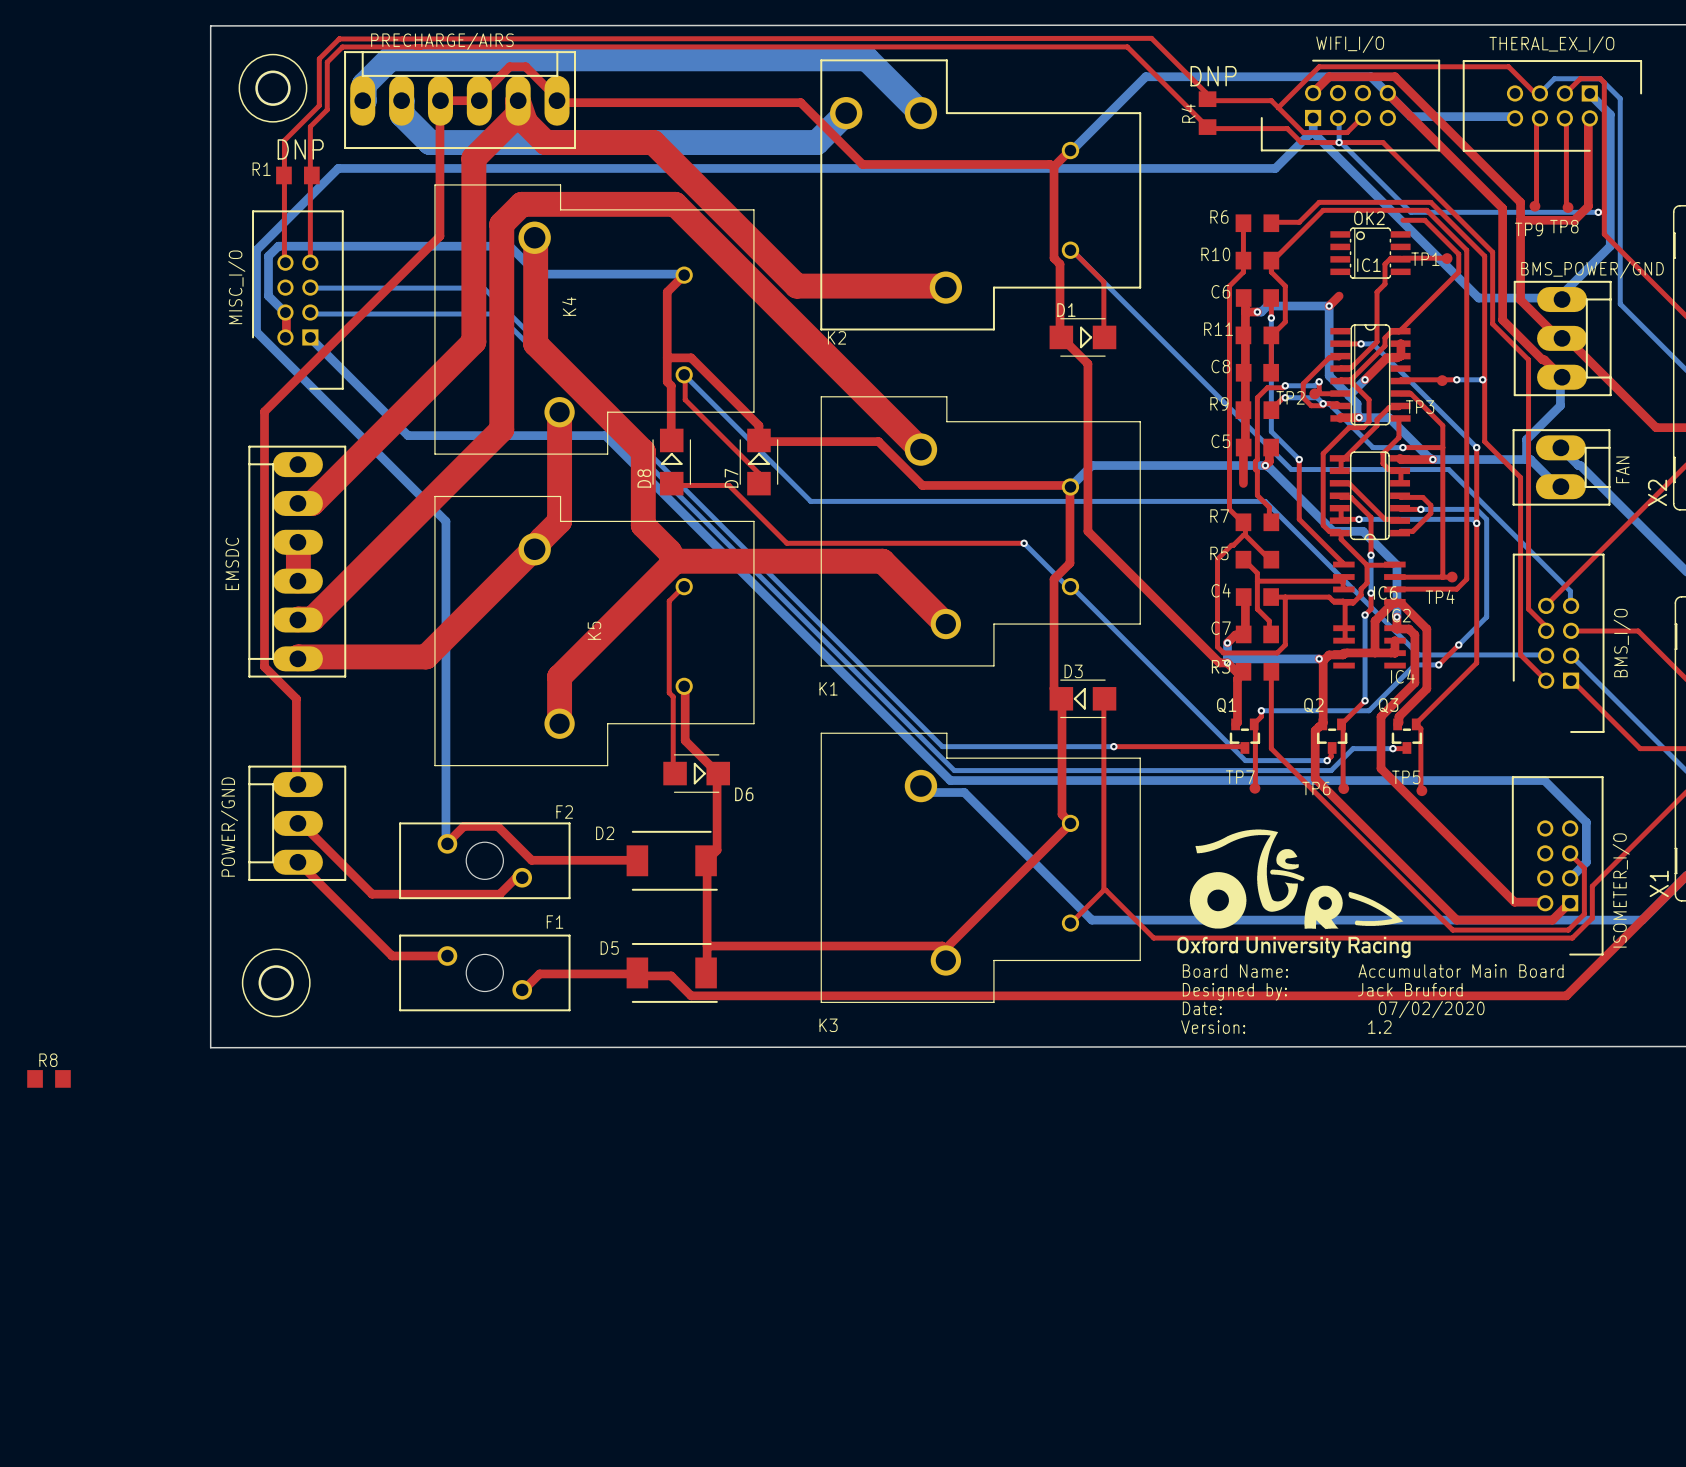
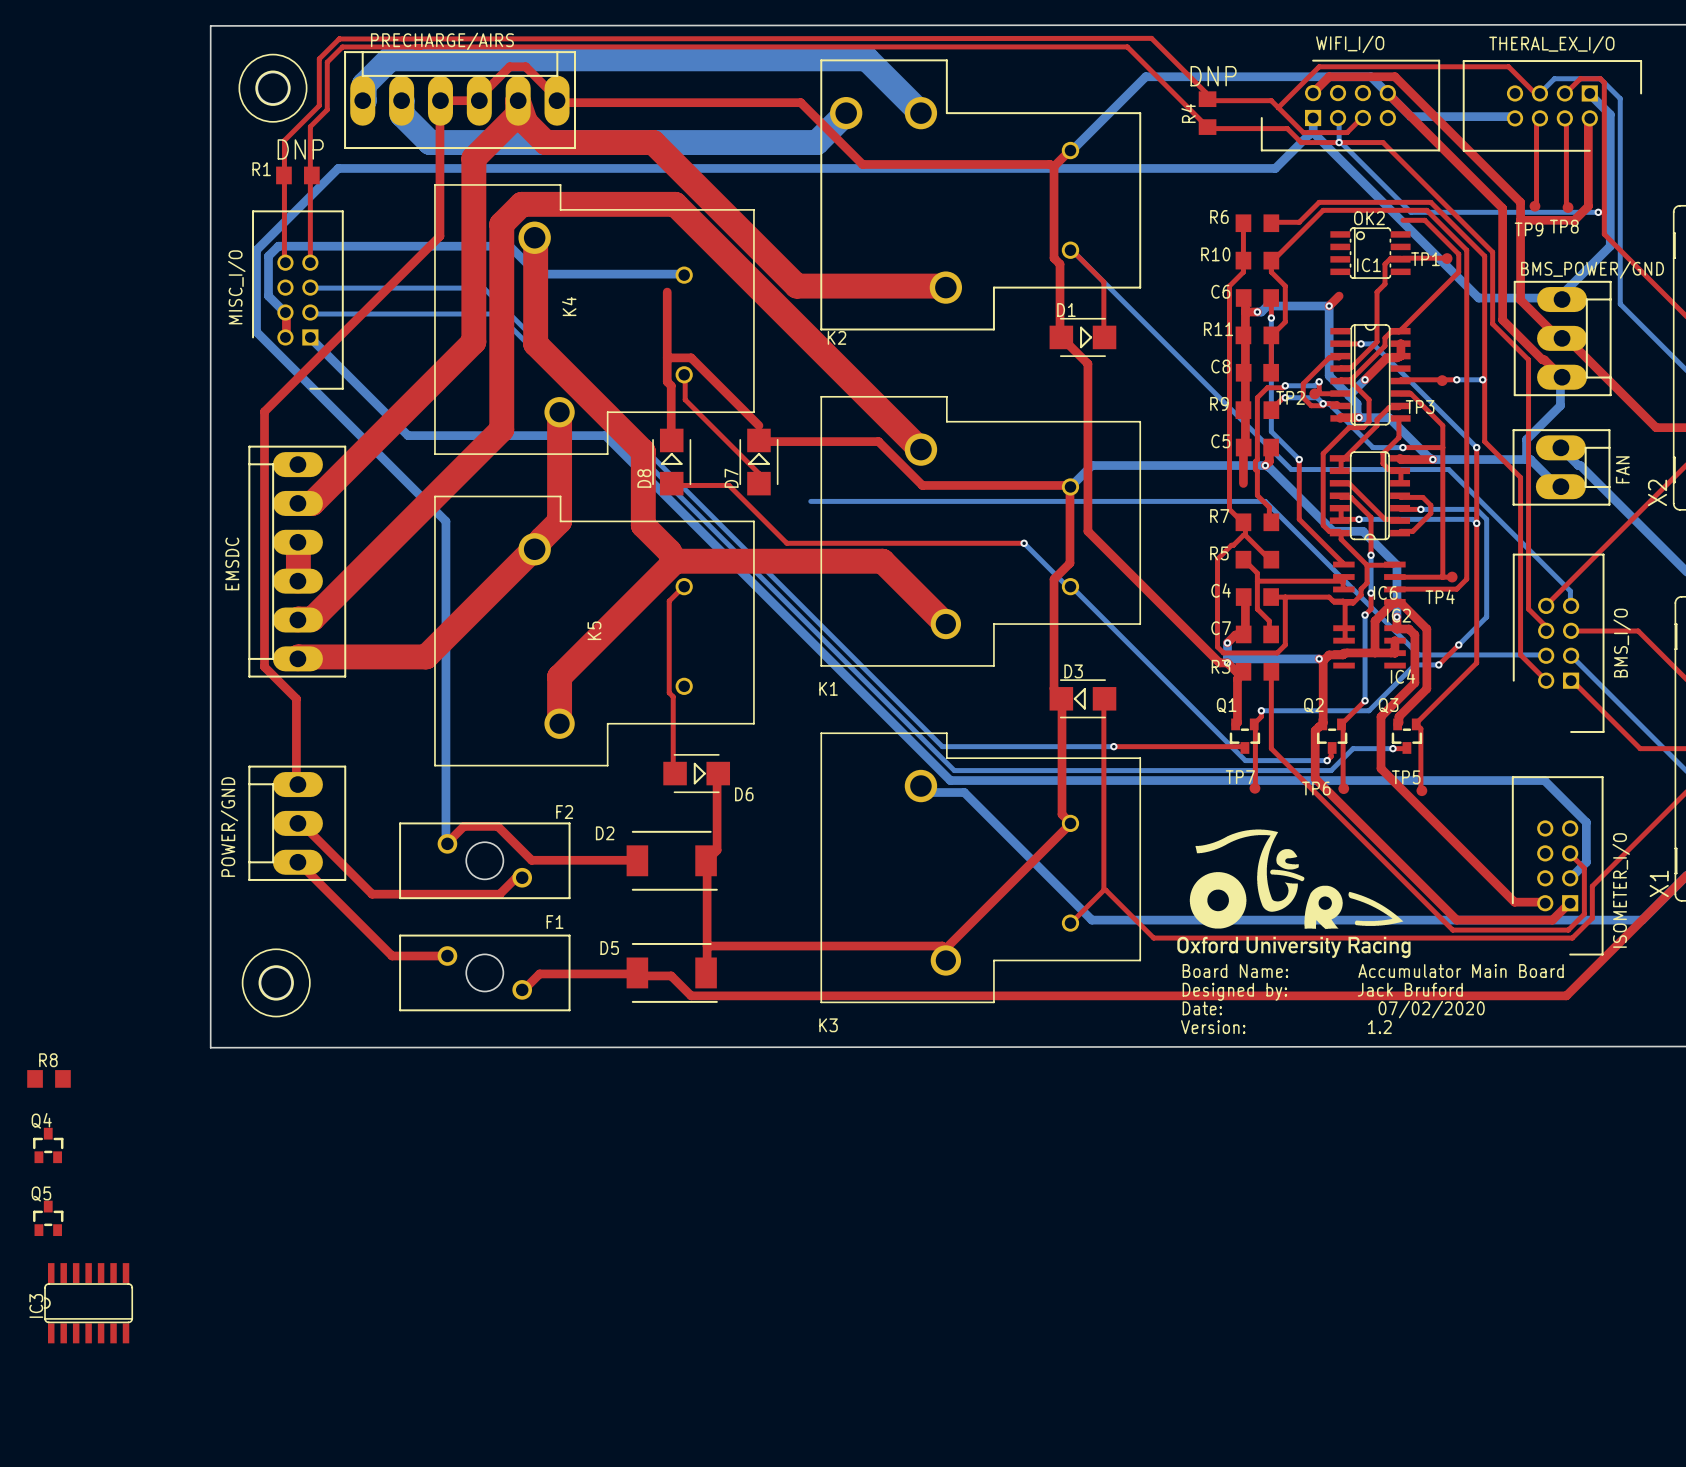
top track: (684, 275) (667, 292) -> none
bottom track: (684, 374) (810, 501) -> none
top track: (684, 686) (685, 740) (718, 773) (717, 774) -> none
Q4: none -> (48, 1145)
Q5: none -> (48, 1218)
IC3: none -> (88, 1303)

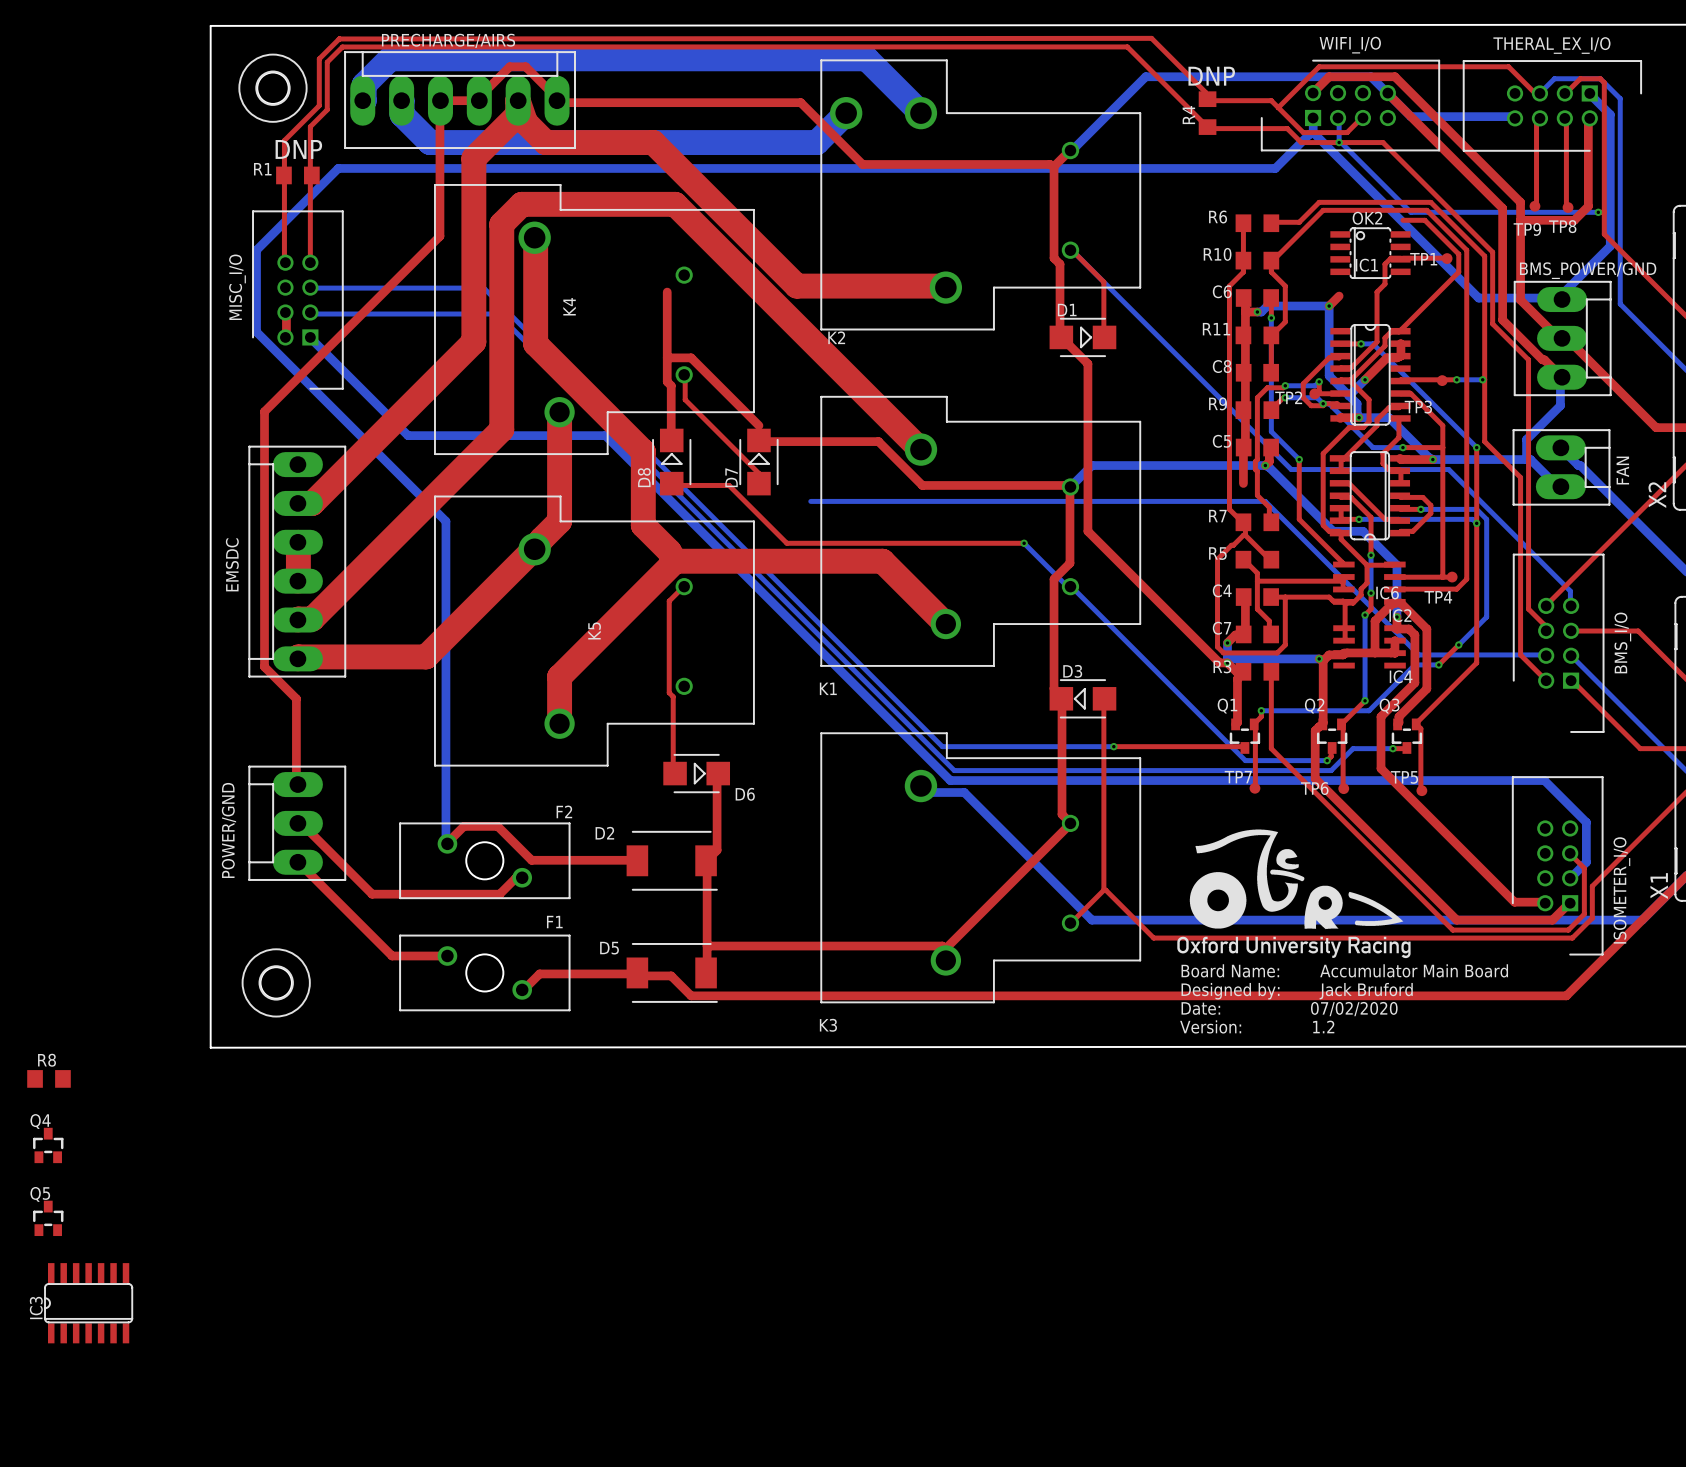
bottom track: (684, 275) (537, 274) (509, 246) (278, 246) (268, 256) (268, 296) (285, 312) -> none

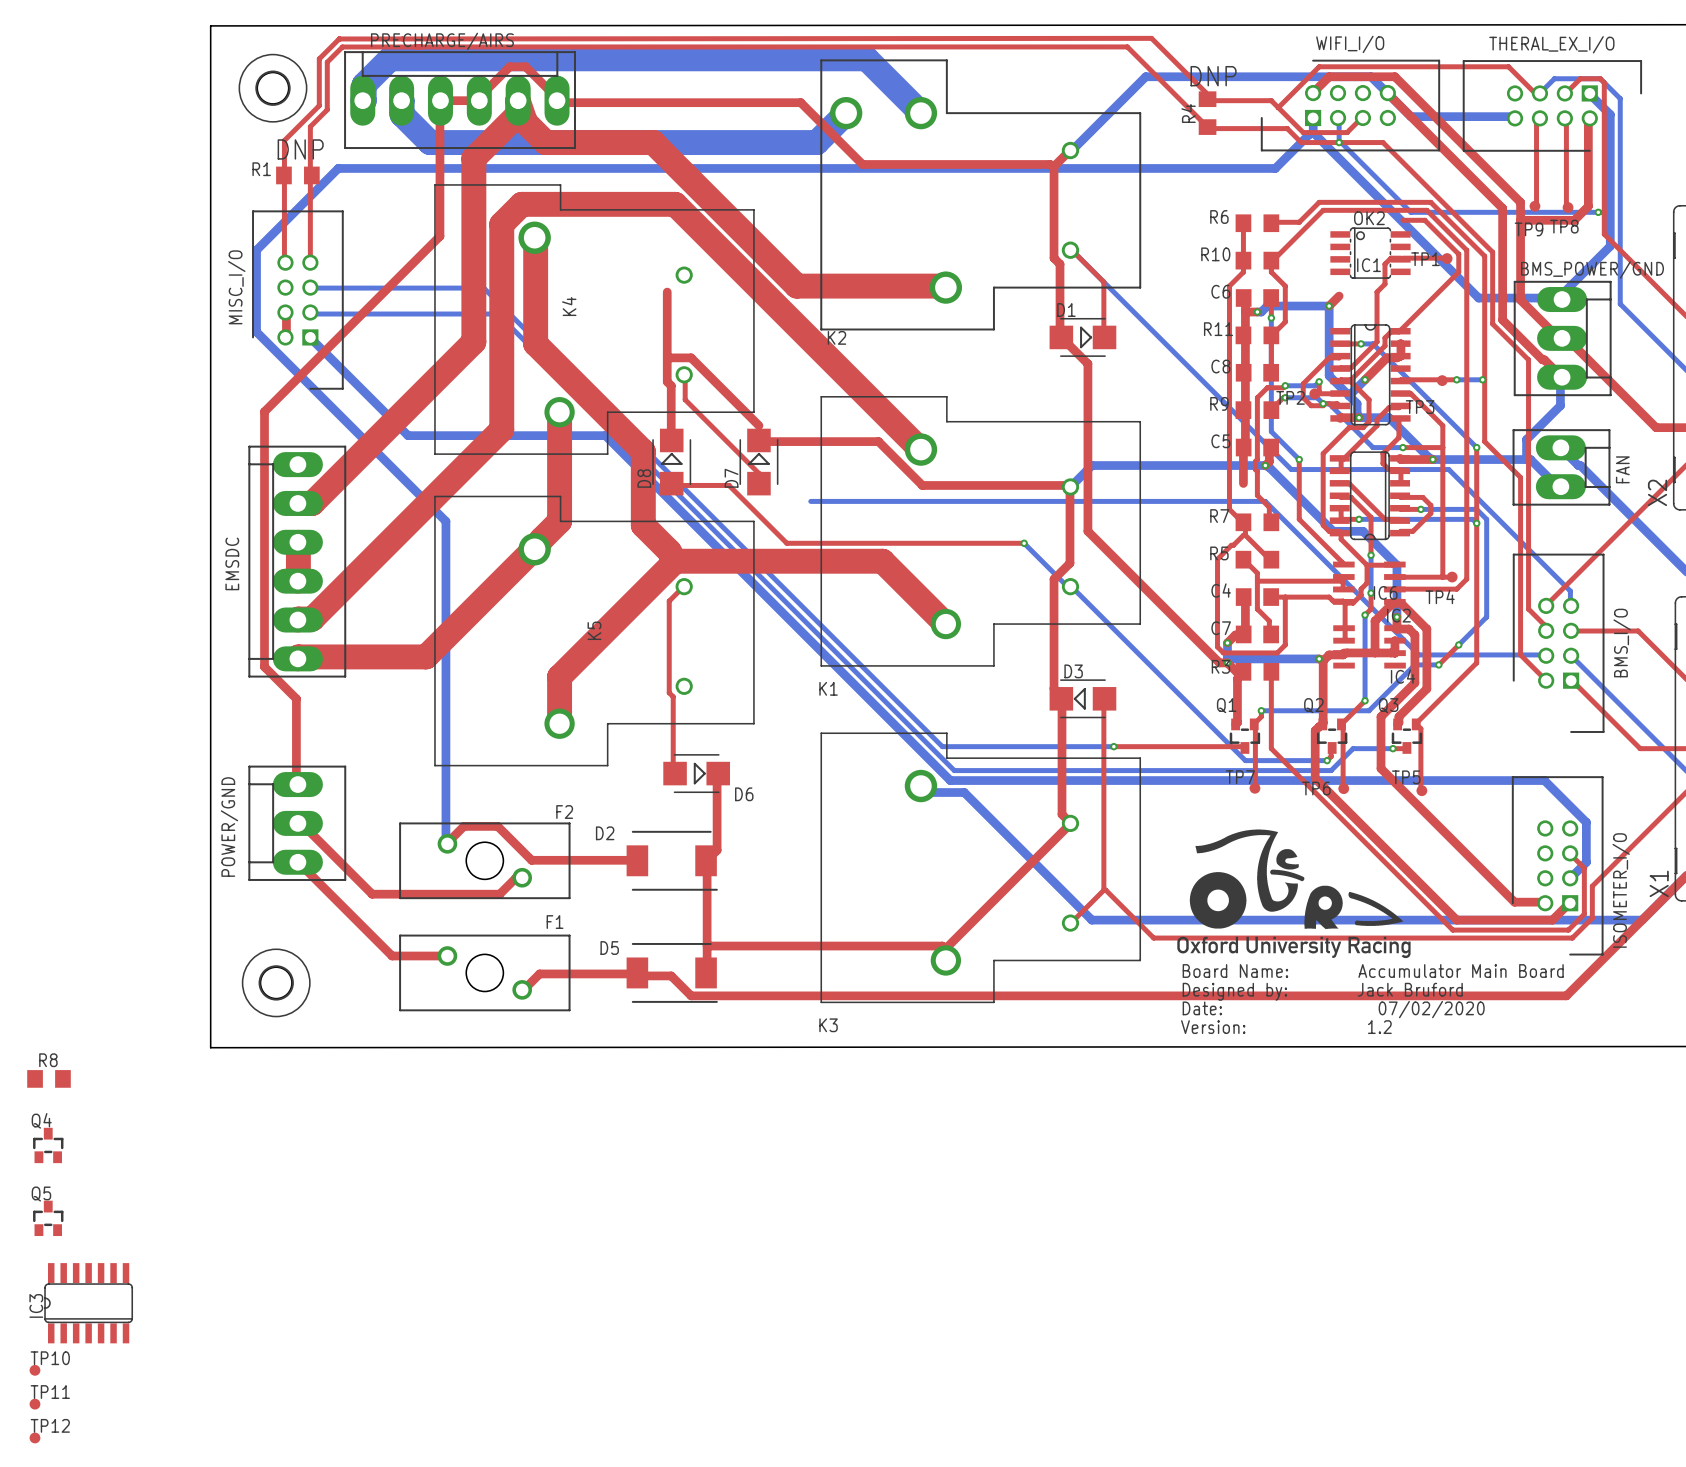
TP10: none -> (34, 1370)
TP11: none -> (34, 1404)
TP12: none -> (34, 1437)

